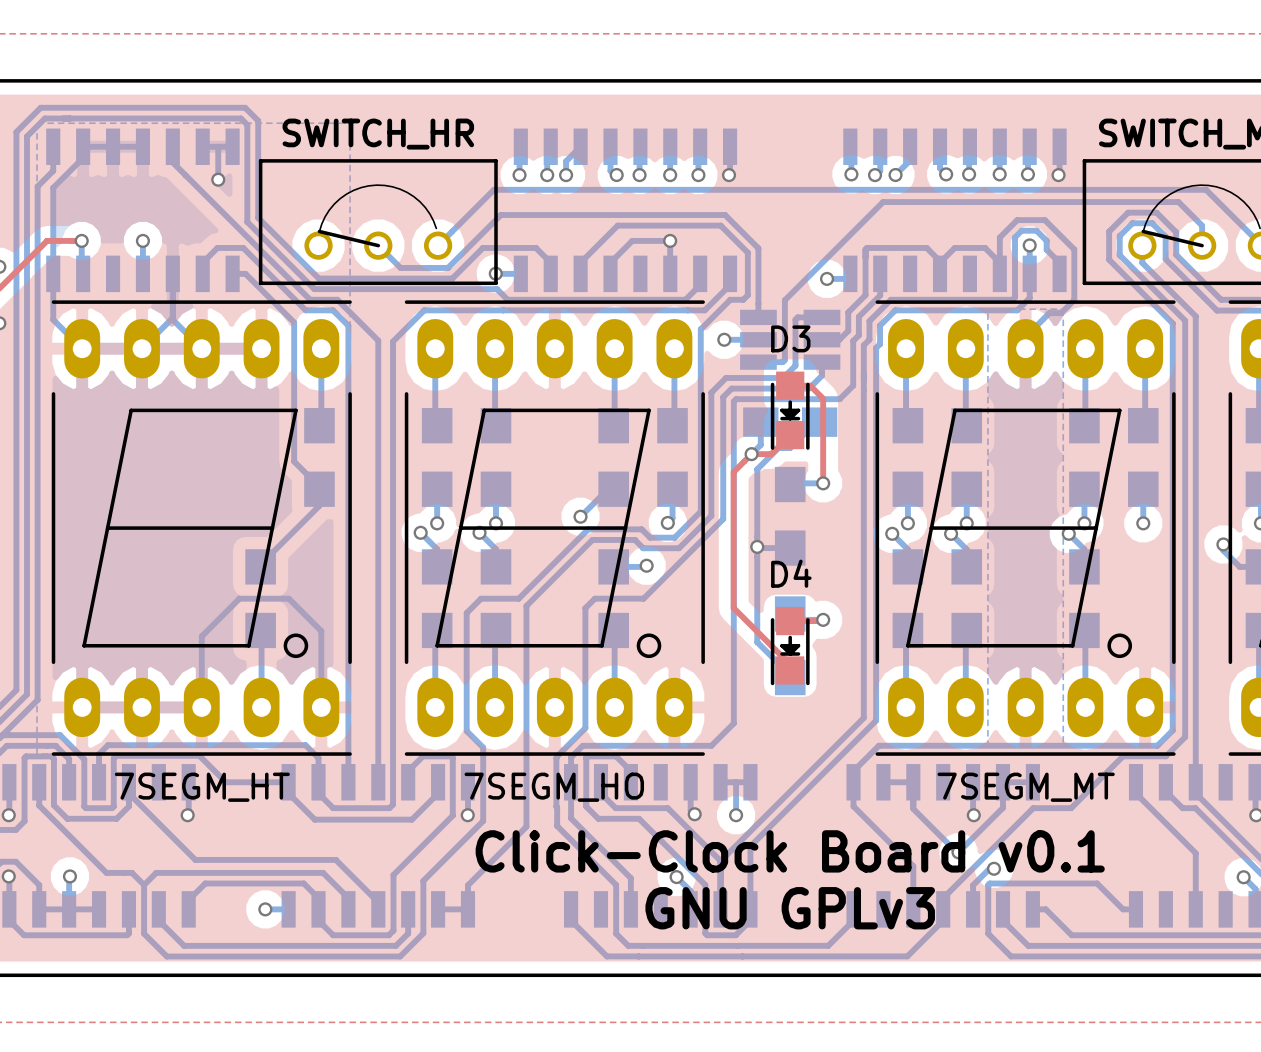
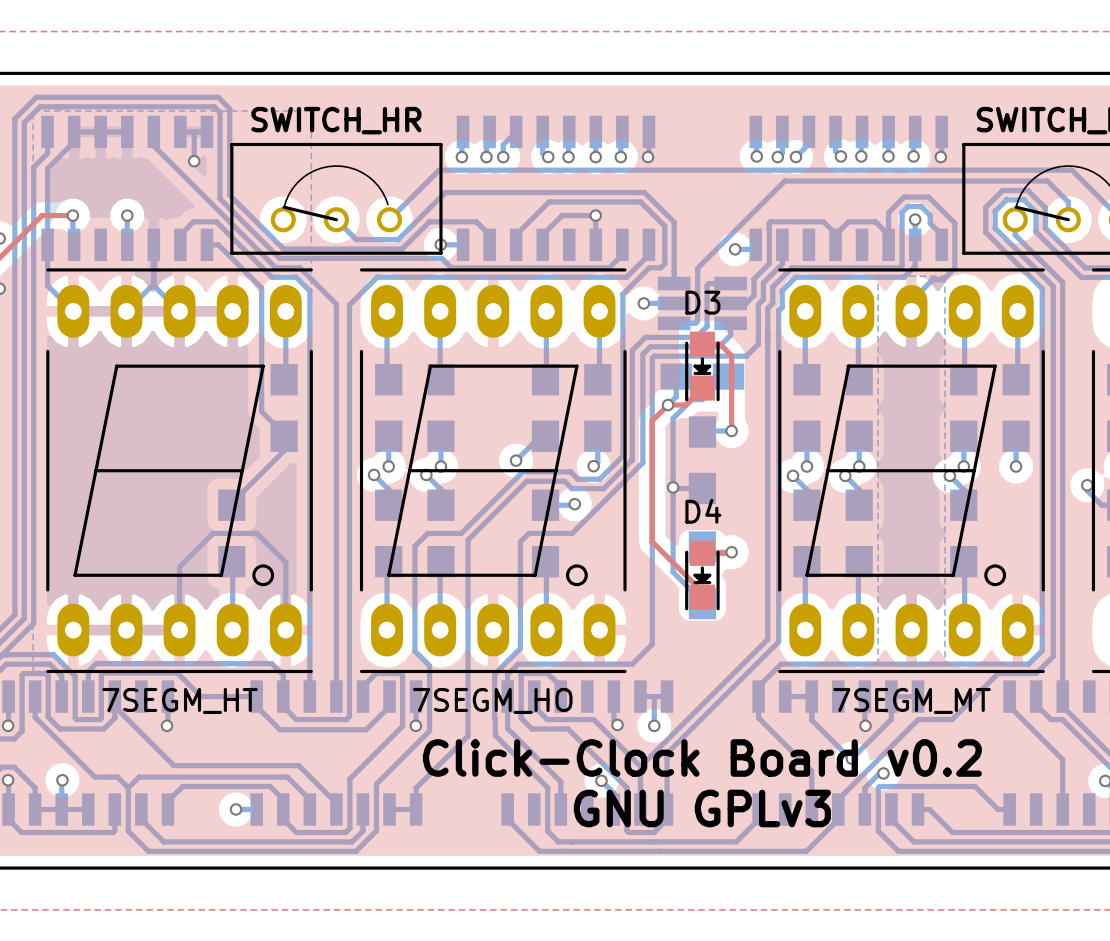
text: Click-Clock Board v0.1 (790, 851) -> Click-Clock Board v0.2 (702, 757)

